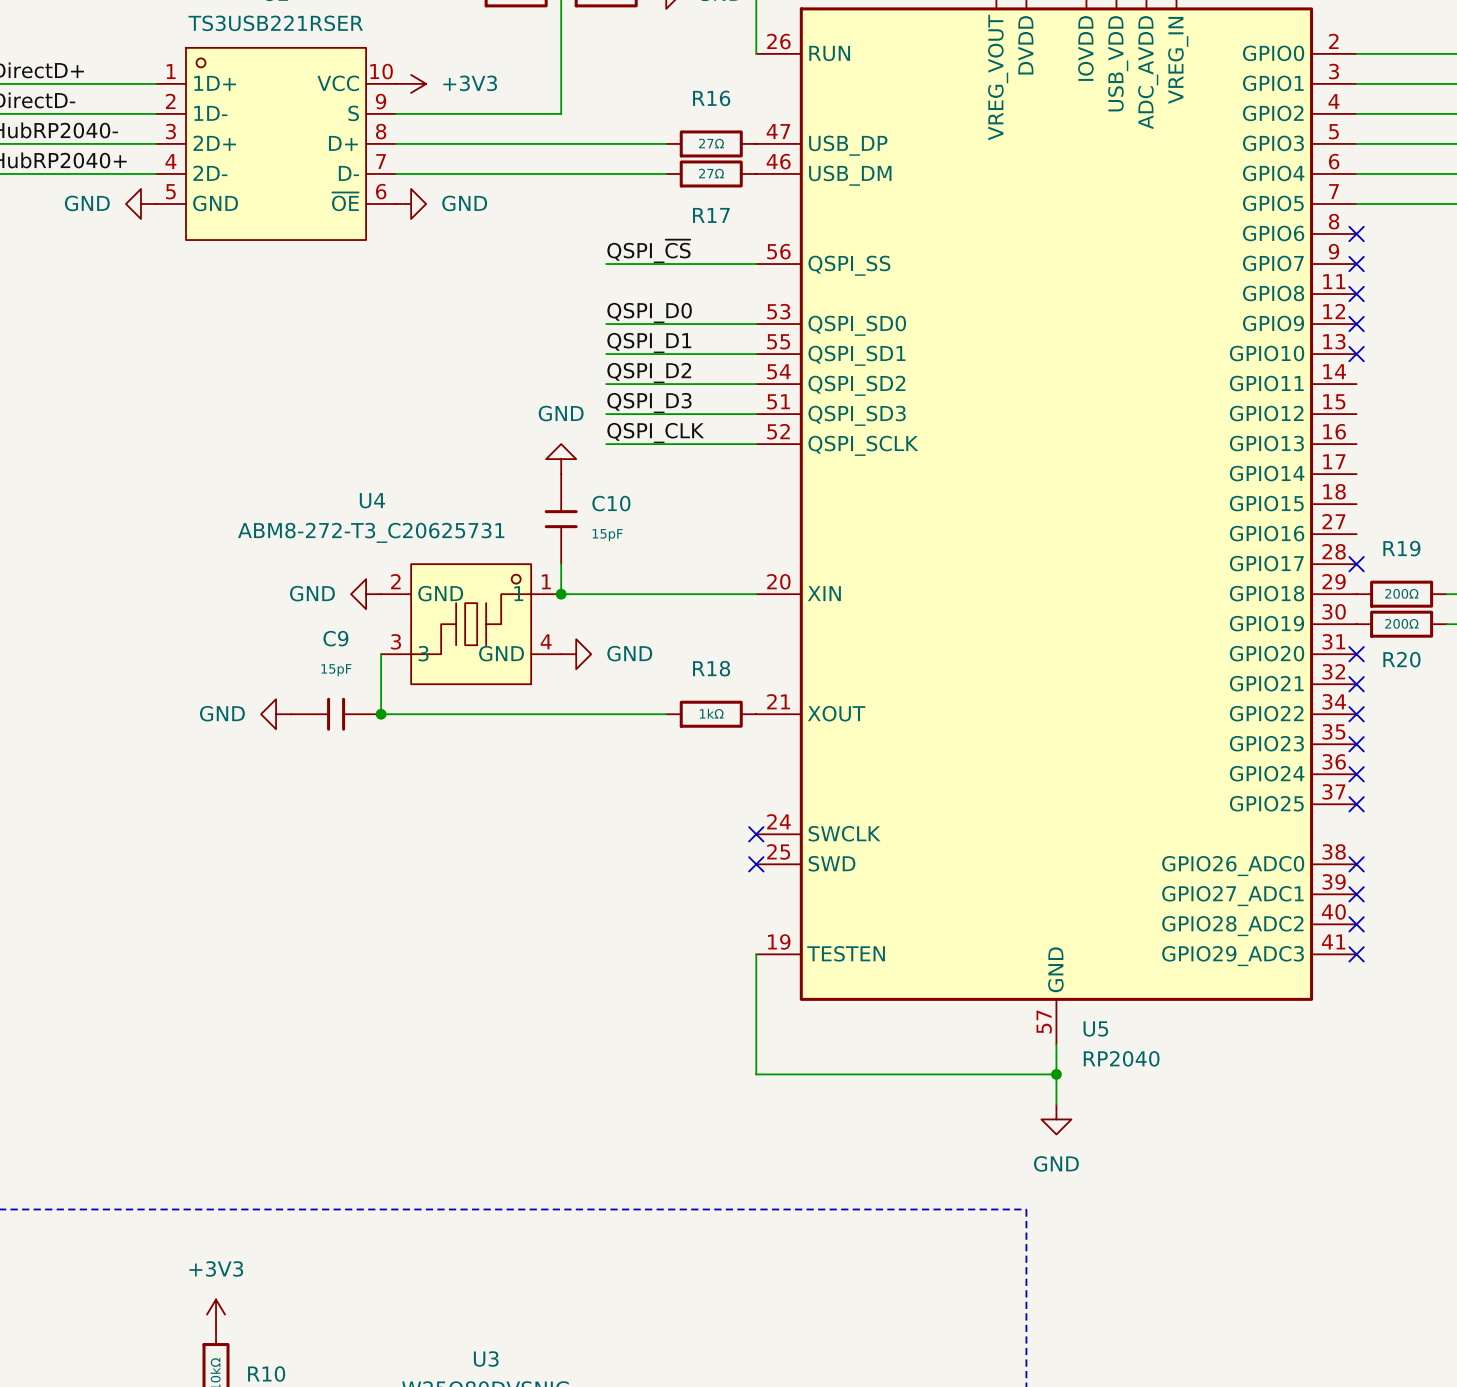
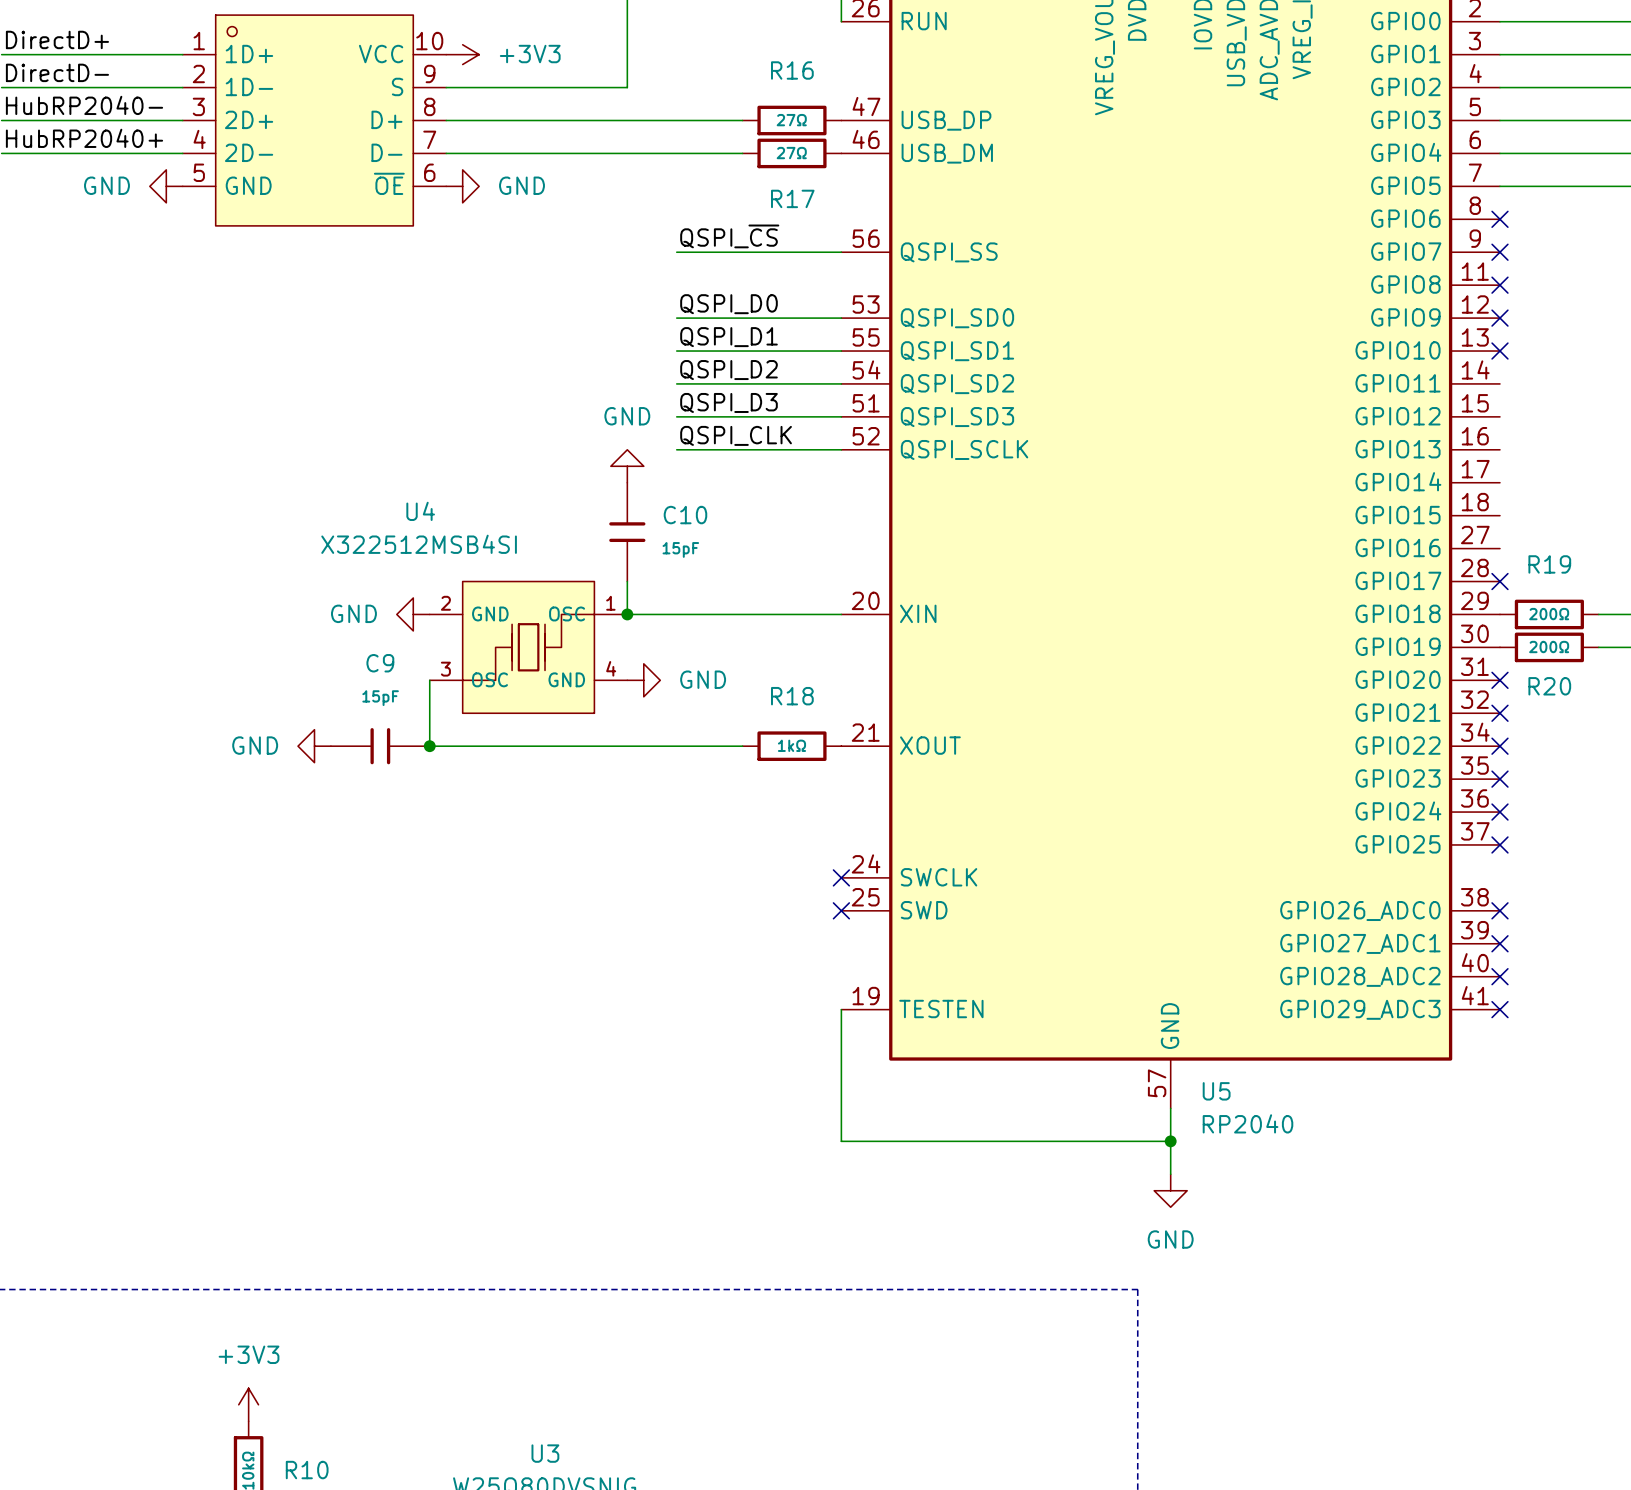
U4 value: ABM8-272-T3_C20625731 (371, 532) -> X322512MSB4SI (419, 544)
U4 symbol: [381, 564, 562, 685] -> [429, 581, 628, 714]

